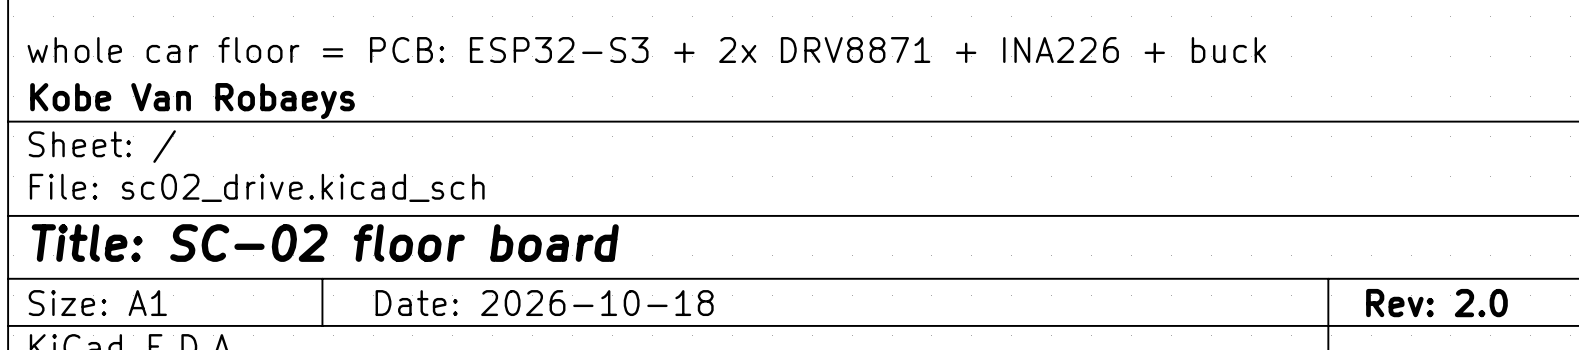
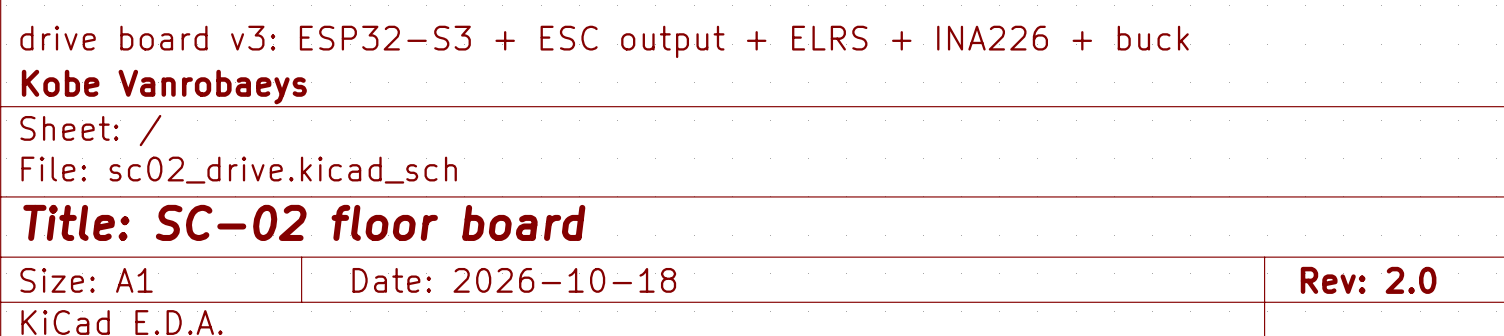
title block: whole car floor = PCB: ESP32-S3 + 2x DRV8871 + INA226 + buck (646, 50) -> drive board v3: ESP32-S3 + ESC output + ELRS + INA226 + buck (604, 41)
title block: Kobe Van Robaeys (192, 101) -> Kobe Vanrobaeys (164, 87)

